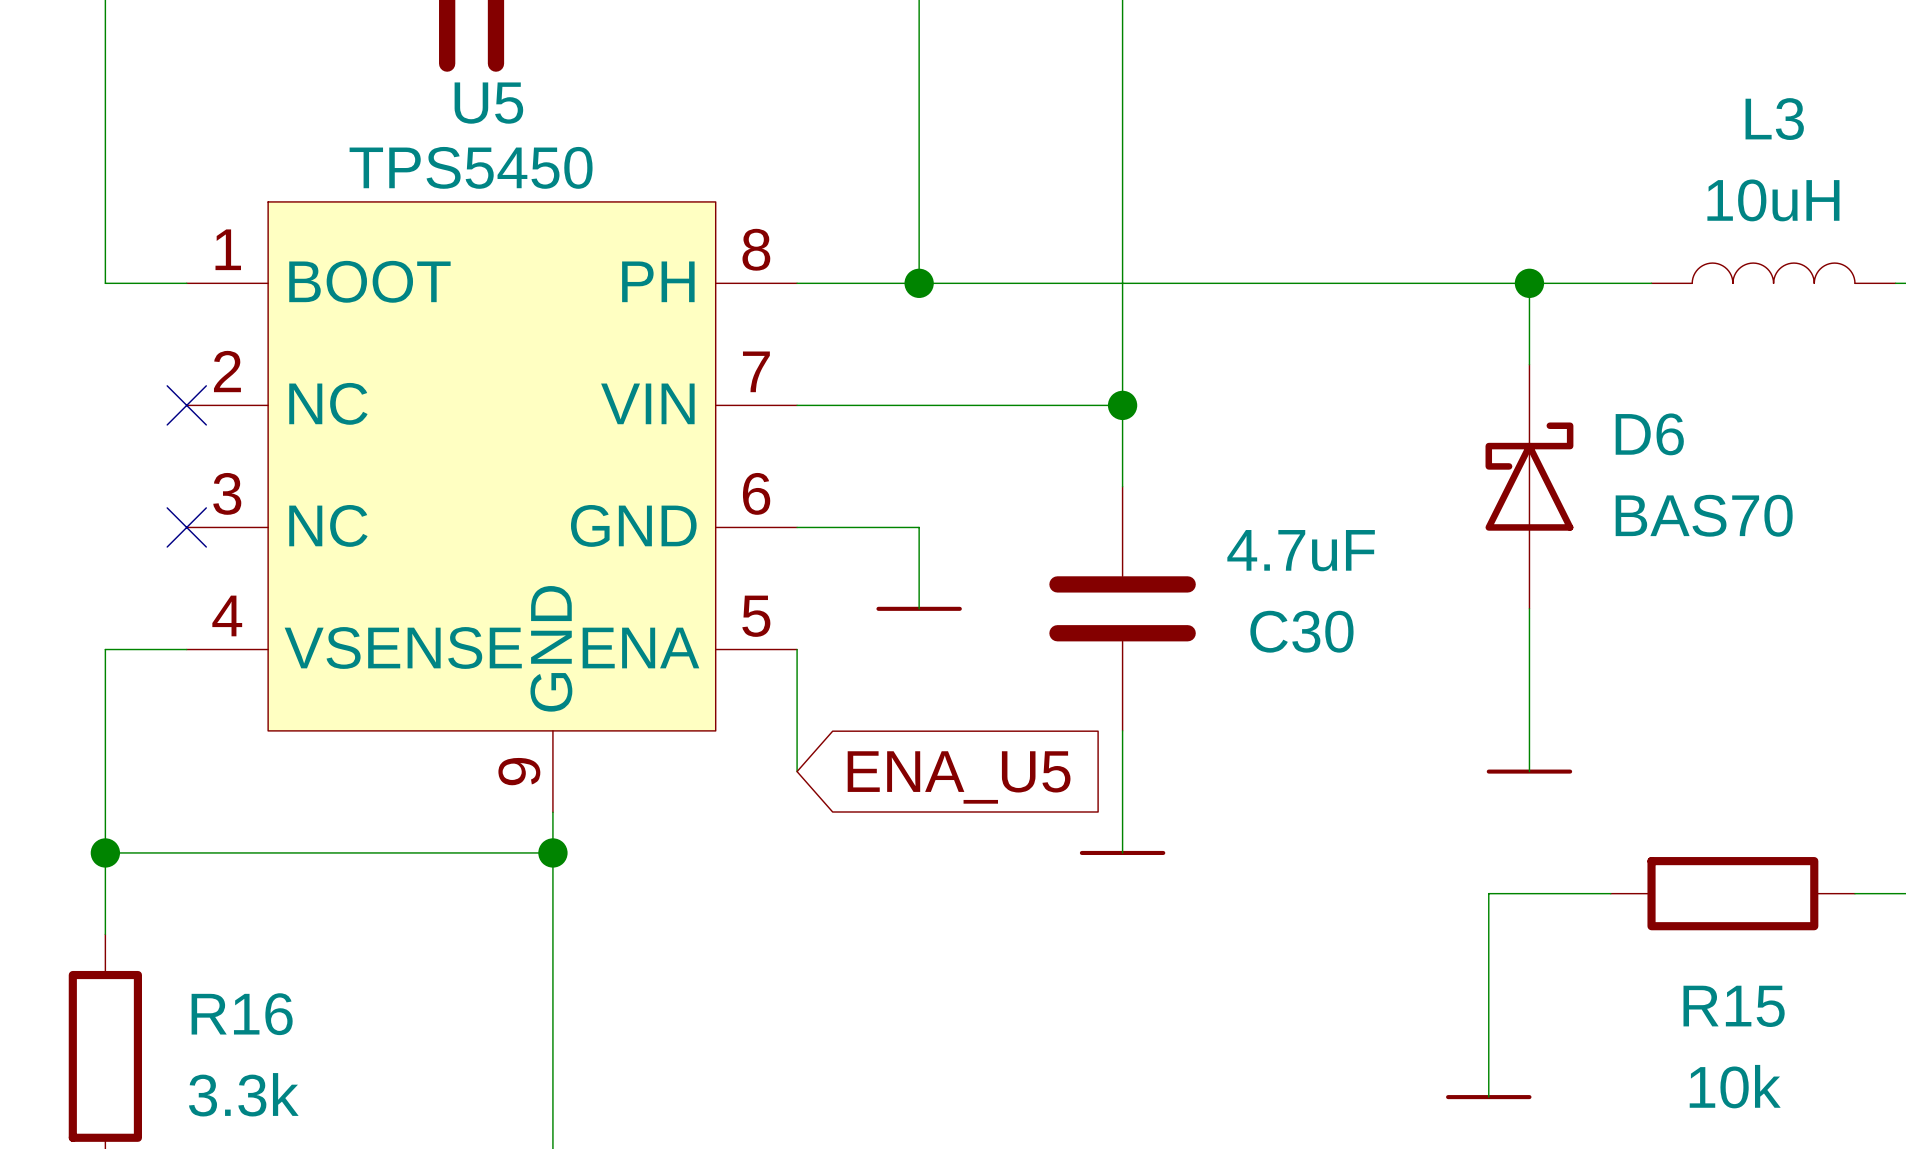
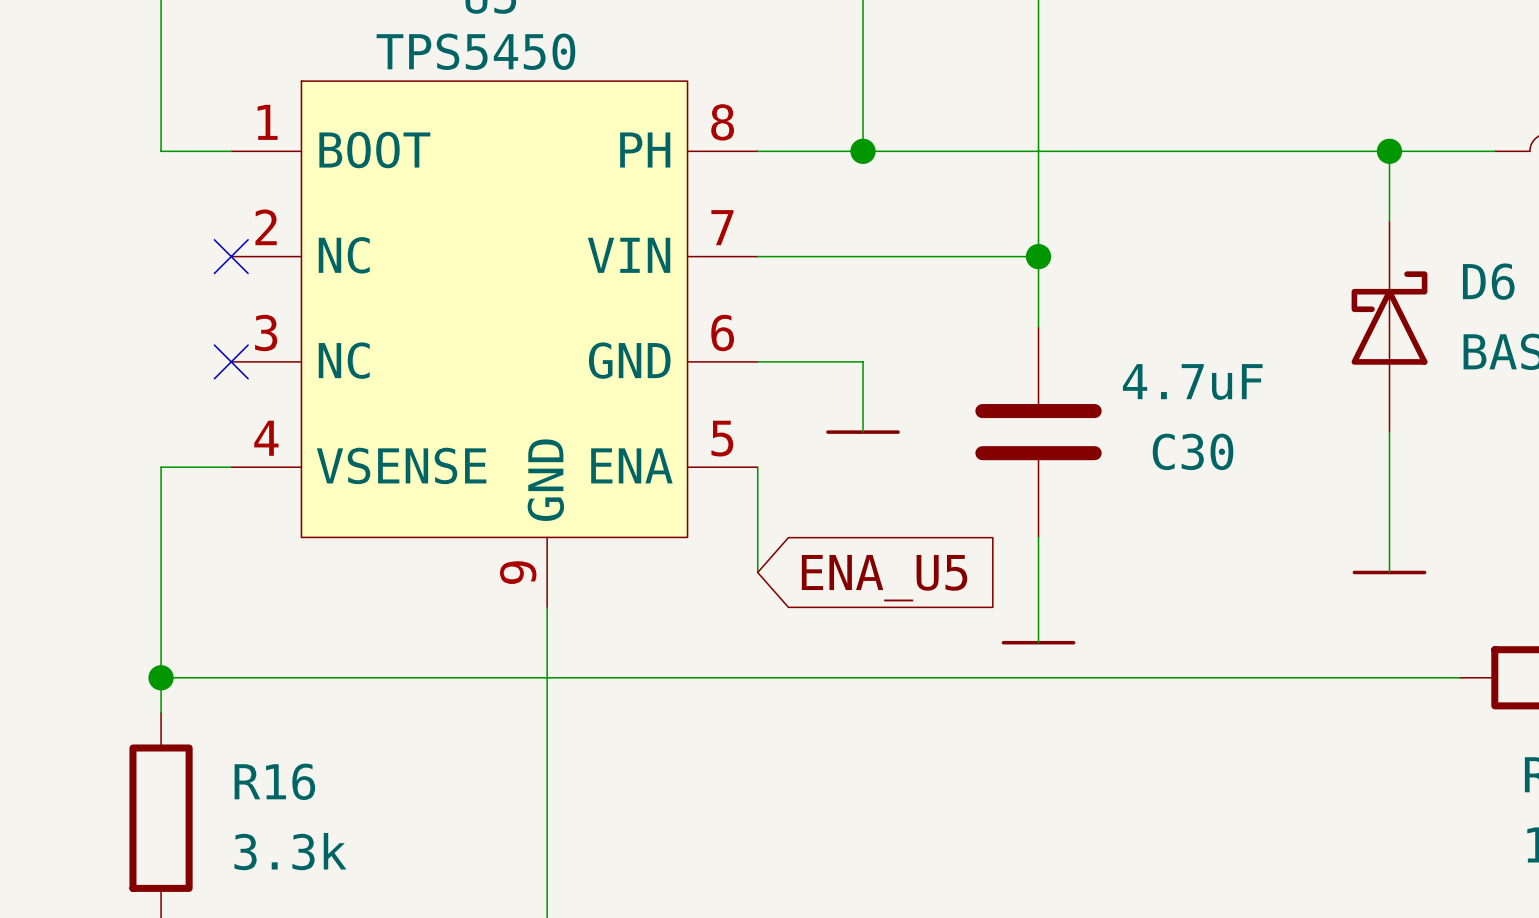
wire: (105, 852) (552, 852) -> none
junction position: (105, 852) -> (161, 677)
junction: (552, 852) -> none
wire: (1488, 893) (1488, 1097) -> (1354, 677) (161, 677)
power symbol: (1488, 1097) -> none

